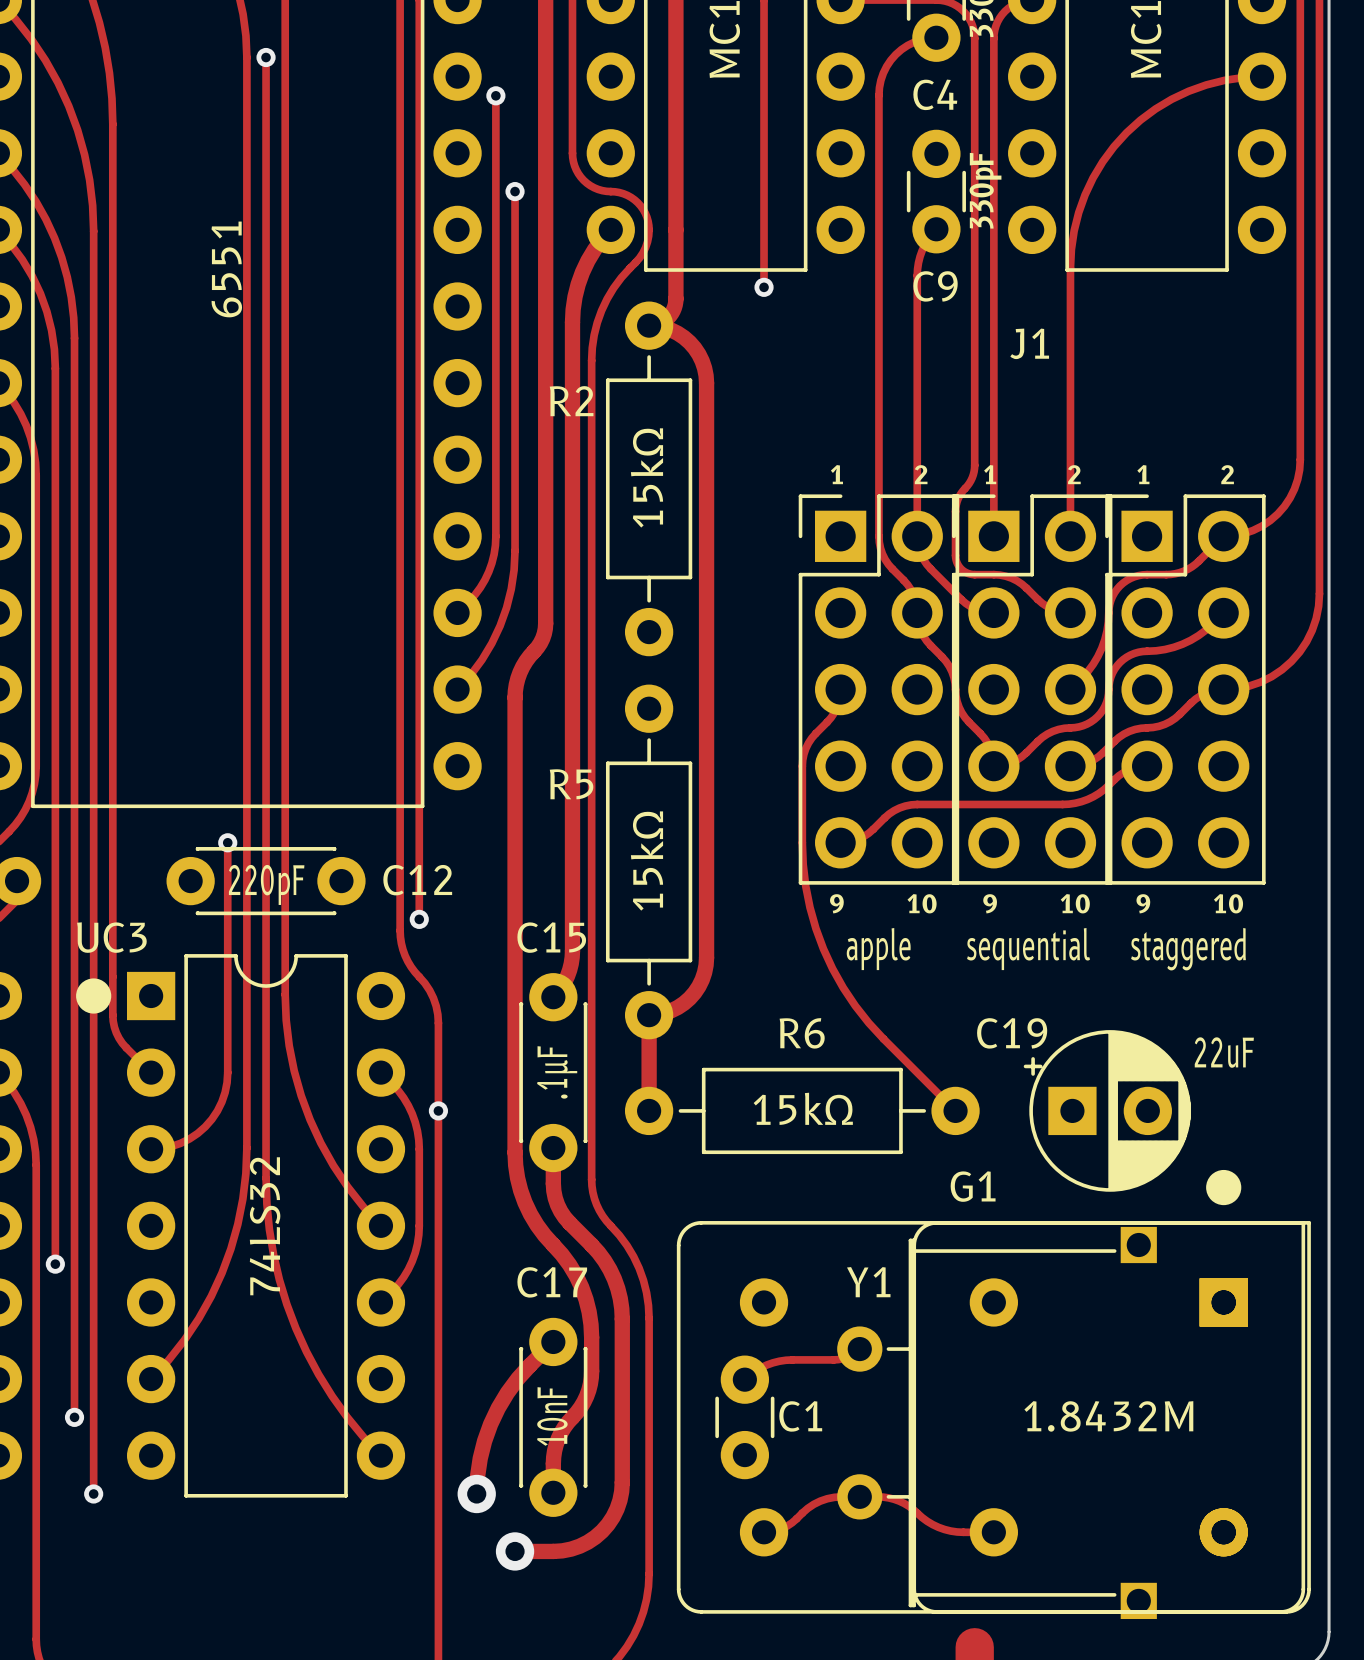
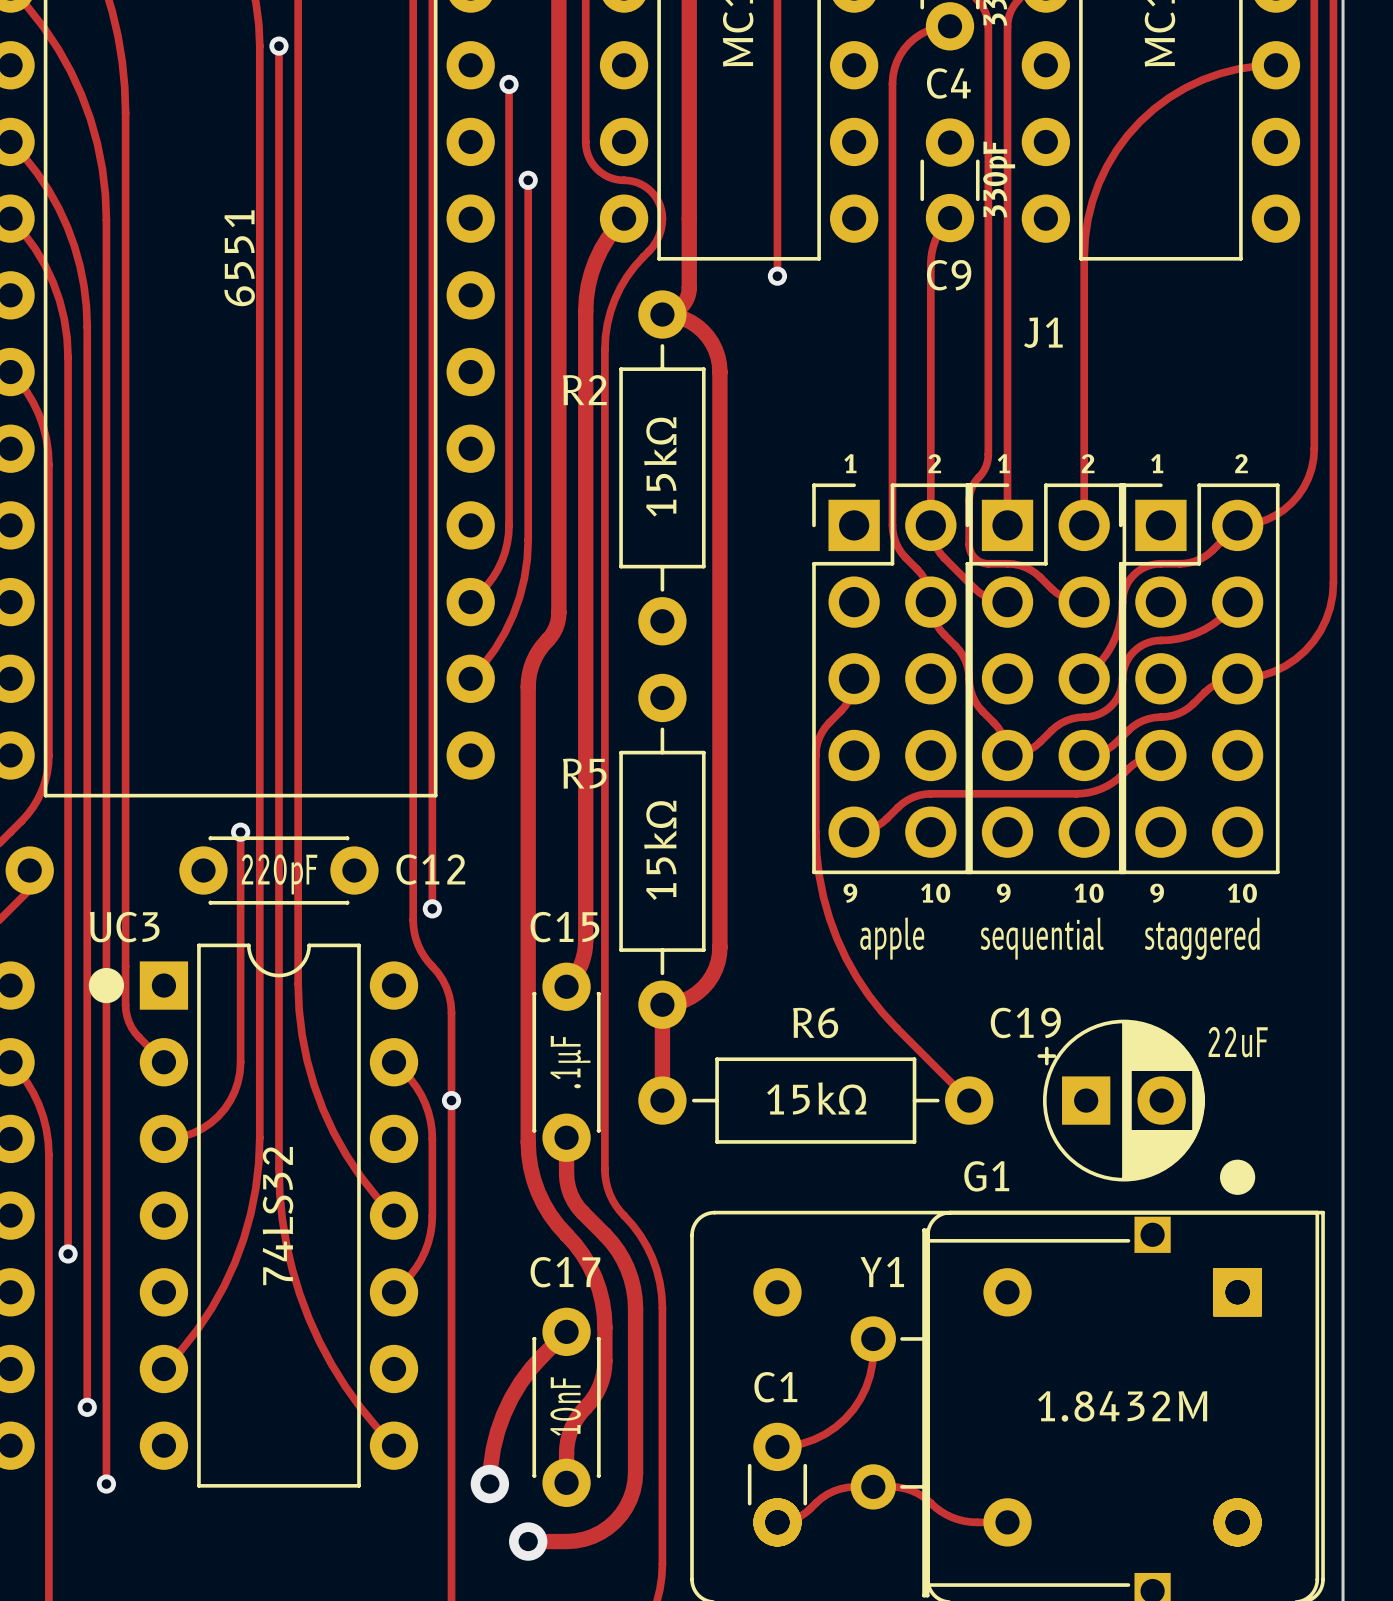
track: (859, 1349) (847, 1357) (838, 1359) (785, 1360) (772, 1362) (760, 1367) (744, 1379) -> (873, 1338) (872, 1363) (866, 1387) (853, 1409) (845, 1418) (835, 1427) (814, 1439) (802, 1443) (777, 1446)
C1 name position: C1 (800, 1416) -> C1 (775, 1387)
C1 position: (744, 1417) -> (777, 1484)

